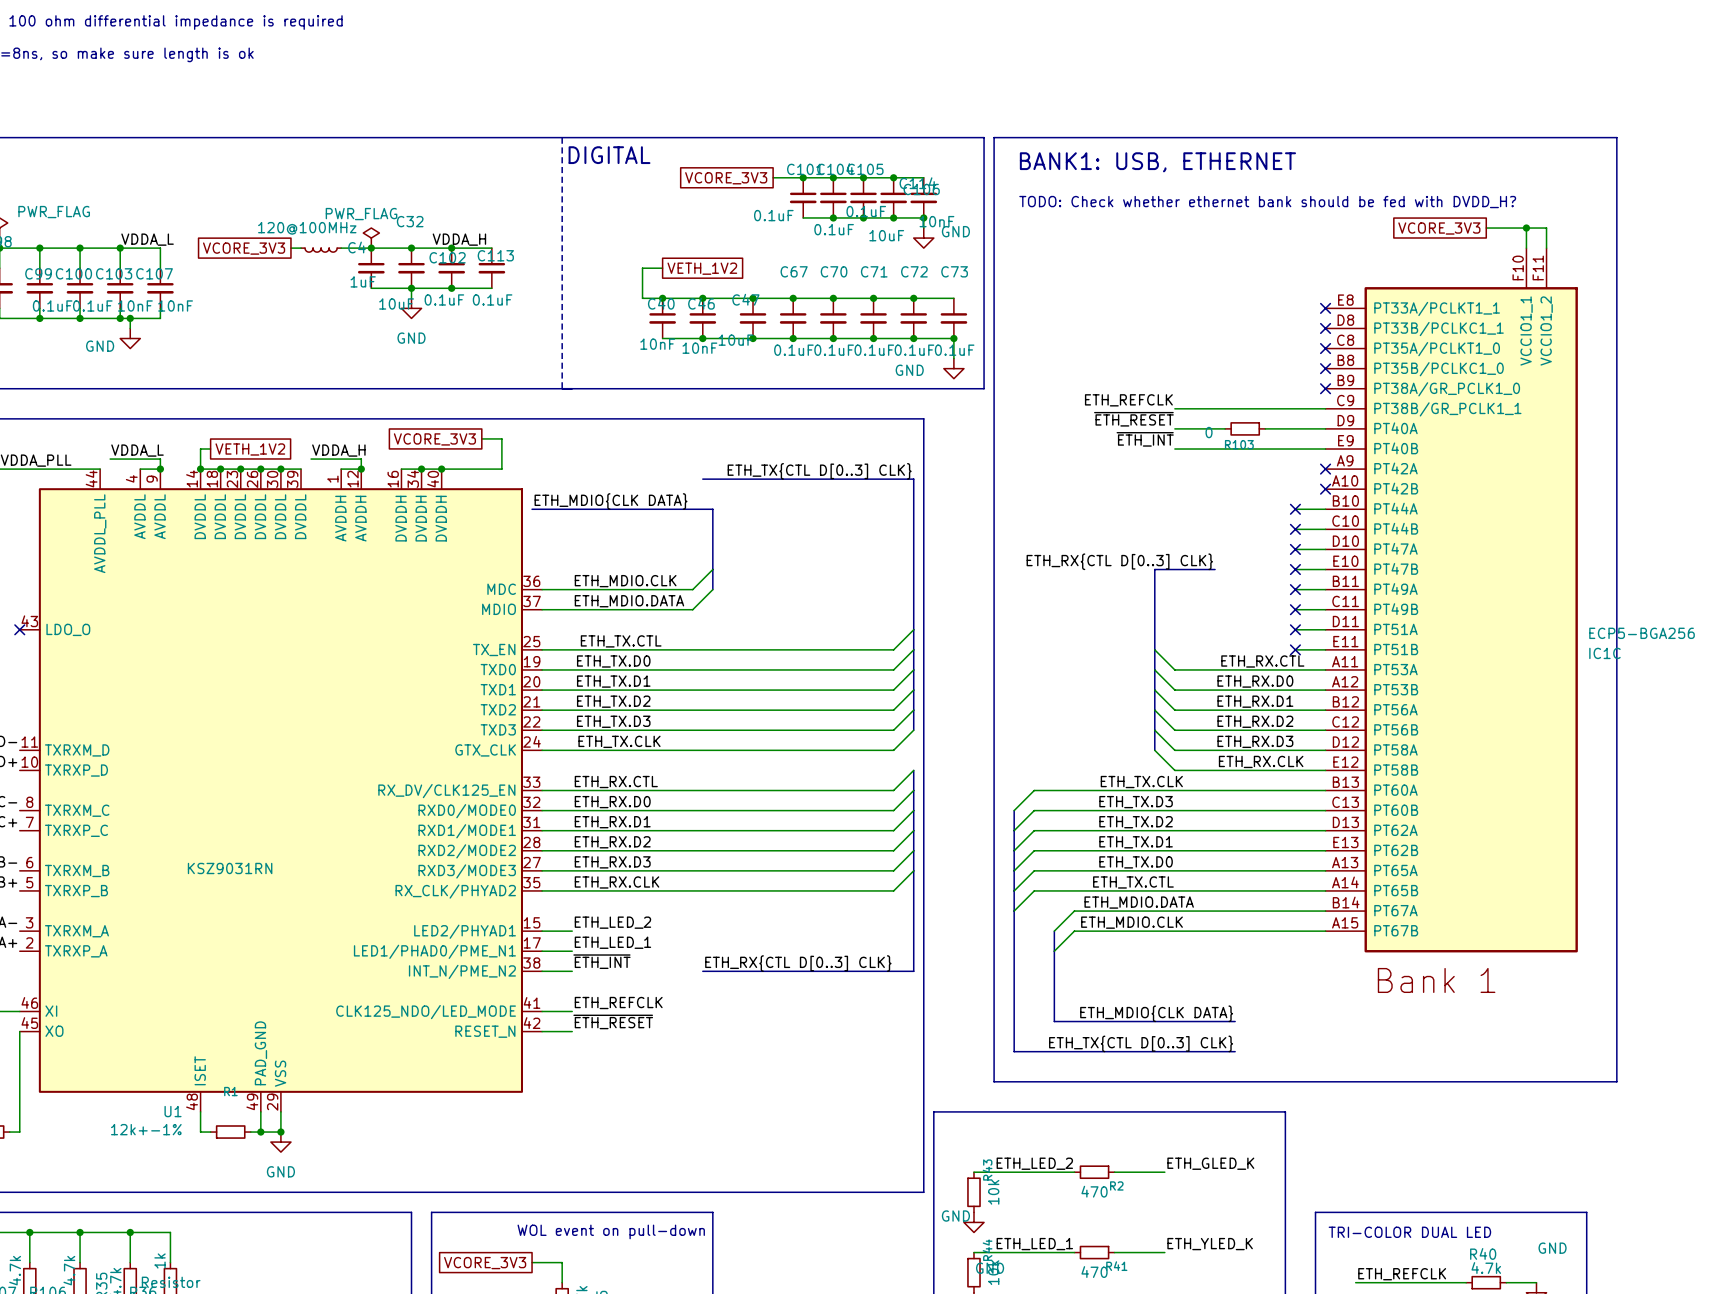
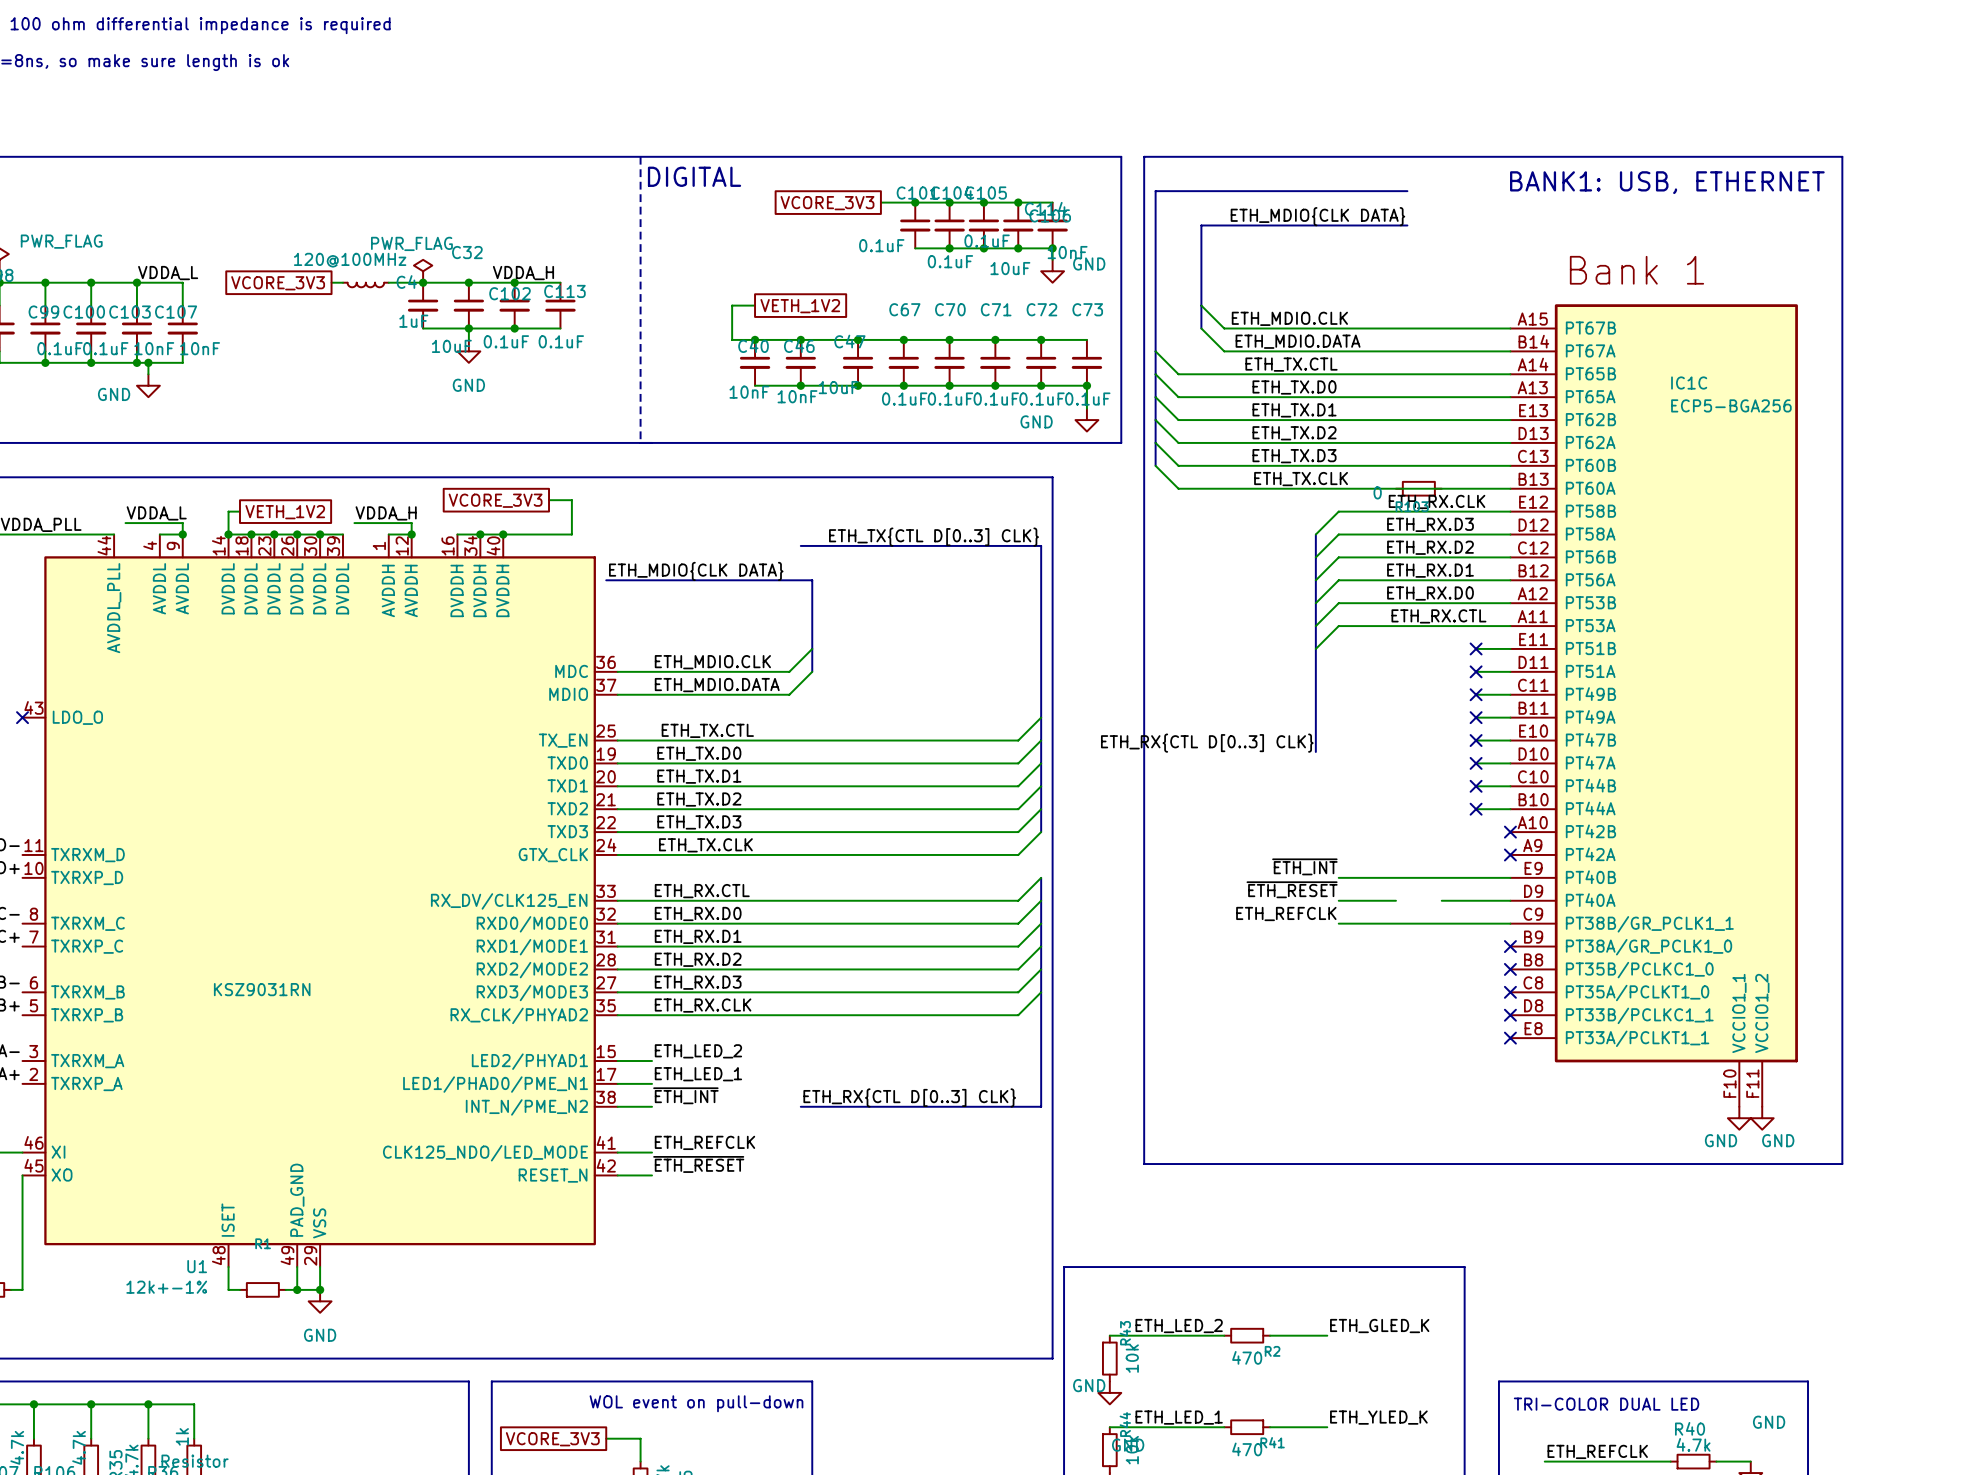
line: (1004, 137) (994, 137) (994, 1081) (1616, 1081) (1616, 1021) -> (1144, 156) (1144, 1164) (1842, 1164)
text: none -> BANK1: USB, ETHERNET (1667, 182)
text: BANK1: USB, ETHERNET (1157, 162) -> none
bus: none -> (1407, 191) (1155, 191) (1155, 465)
label: none -> ETH_MDIO{CLK DATA} (1317, 216)
bus: none -> (1407, 225) (1201, 225) (1201, 328)
text: TODO: Check whether ethernet bank should be fed with DVDD_H? (1267, 202) -> none
global label: VCORE_3V3 (1439, 228) -> none
wire: (1486, 228) (1546, 228) (1546, 248) -> none
wire: (1526, 228) (1526, 248) -> none
junction: (1526, 228) -> none
wire: none -> (1201, 305) (1224, 328) (1510, 328)
label: none -> ETH_MDIO.CLK (1289, 318)
wire: none -> (1201, 328) (1224, 351) (1510, 351)
label: none -> ETH_MDIO.DATA (1298, 341)
wire: none -> (1155, 351) (1178, 374) (1510, 374)
no-connect mark: (1325, 308) -> none
label: none -> ETH_TX.CTL (1291, 364)
wire: none -> (1155, 374) (1178, 397) (1510, 397)
no-connect mark: (1325, 328) -> none
label: none -> ETH_TX.D0 (1294, 387)
wire: none -> (1155, 397) (1178, 420) (1510, 420)
no-connect mark: (1325, 348) -> none
label: none -> ETH_TX.D1 (1294, 410)
wire: none -> (1155, 420) (1178, 442) (1510, 442)
no-connect mark: (1325, 368) -> none
label: none -> ETH_TX.D2 (1294, 433)
wire: none -> (1155, 442) (1178, 465) (1338, 465)
no-connect mark: (1325, 388) -> none
label: ETH_REFCLK (1128, 400) -> ETH_TX.D3 (1294, 456)
wire: none -> (1155, 465) (1178, 488) (1338, 488)
label: ~{ETH_RESET} (1133, 419) -> none
label: none -> ETH_TX.CLK (1301, 479)
wire: none -> (1395, 488) (1441, 488)
label: ~{ETH_INT} (1145, 439) -> none
label: none -> ETH_RX.CLK (1437, 501)
wire: none -> (1338, 511) (1315, 534)
label: none -> ETH_RX.D3 (1430, 524)
wire: none -> (1510, 534) (1338, 534) (1315, 557)
no-connect mark: (1325, 469) -> none
label: none -> ETH_RX.D2 (1430, 547)
wire: none -> (1510, 557) (1338, 557) (1315, 580)
no-connect mark: (1325, 489) -> none
label: none -> ETH_RX.D1 (1430, 570)
wire: none -> (1476, 580) (1338, 580) (1315, 603)
no-connect mark: (1295, 509) -> none
wire: none -> (1476, 603) (1338, 603) (1315, 626)
no-connect mark: (1295, 529) -> none
wire: none -> (1476, 626) (1338, 626) (1315, 648)
no-connect mark: (1295, 549) -> none
label position: ETH_RX{CTL D[0..3] CLK} (1119, 561) -> ETH_RX{CTL D[0..3] CLK} (1207, 743)
bus: (1154, 569) (1215, 569) -> (1315, 648) (1315, 534)
IC1C flip: as is (1471, 619) -> up-down (1676, 683)
IC1C value position: ECP5-BGA256 (1642, 633) -> ECP5-BGA256 (1731, 405)
wire: (1154, 649) (1174, 669) (1295, 669) -> none
IC1C name position: IC1C (1604, 653) -> IC1C (1689, 383)
bus: (1154, 659) (1154, 750) -> none
label position: ETH_RX.CTL (1262, 661) -> ETH_RX.CTL (1438, 616)
wire: (1154, 669) (1174, 690) (1295, 690) -> none
no-connect mark: none -> (1476, 763)
label position: ETH_RX.D0 (1255, 681) -> ETH_RX.D0 (1430, 593)
wire: (1154, 690) (1174, 710) (1295, 710) -> none
no-connect mark: none -> (1476, 786)
label: ETH_RX.D1 (1255, 701) -> none
wire: (1154, 710) (1174, 730) (1325, 730) -> none
no-connect mark: none -> (1476, 809)
label: ETH_RX.D2 (1255, 721) -> none
wire: (1154, 730) (1174, 750) (1325, 750) -> none
no-connect mark: none -> (1510, 832)
label: ETH_RX.D3 (1255, 741) -> none
wire: (1154, 750) (1174, 770) -> none
no-connect mark: none -> (1510, 854)
label: none -> ~{ETH_INT} (1304, 866)
label: ETH_RX.CLK (1261, 761) -> none
label: none -> ~{ETH_RESET} (1292, 889)
label: ETH_TX.CLK (1141, 782) -> none
wire: (1174, 790) (1034, 790) (1014, 810) -> none
wire: (1225, 790) (1265, 790) -> none
label: ETH_TX.D3 (1136, 802) -> ETH_REFCLK (1286, 913)
bus: (1014, 810) (1014, 1051) (1235, 1051) -> none
wire: (1174, 810) (1034, 810) (1014, 830) -> none
label: ETH_TX.D2 (1136, 822) -> none
wire: (1325, 830) (1034, 830) (1014, 850) -> none
no-connect mark: none -> (1510, 946)
label: ETH_TX.D1 (1136, 842) -> none
wire: (1325, 850) (1034, 850) (1014, 870) -> none
no-connect mark: none -> (1510, 969)
label: ETH_TX.D0 (1136, 862) -> none
wire: (1325, 870) (1034, 870) (1014, 890) -> none
no-connect mark: none -> (1510, 992)
label: ETH_TX.CTL (1133, 882) -> none
wire: (1325, 890) (1034, 890) (1014, 911) -> none
no-connect mark: none -> (1510, 1015)
label: ETH_MDIO.DATA (1139, 902) -> none
wire: (1325, 911) (1074, 911) (1054, 931) -> none
no-connect mark: none -> (1510, 1038)
label: ETH_MDIO.CLK (1132, 922) -> none
bus: (1054, 931) (1054, 1021) (1235, 1021) -> none
wire: (1325, 931) (1074, 931) (1054, 951) -> none
power symbol: none -> GND (1739, 1118)
power symbol: none -> GND (1762, 1118)
label: ETH_MDIO{CLK DATA} (1156, 1013) -> none
label: ETH_TX{CTL D[0..3] CLK} (1141, 1043) -> none

